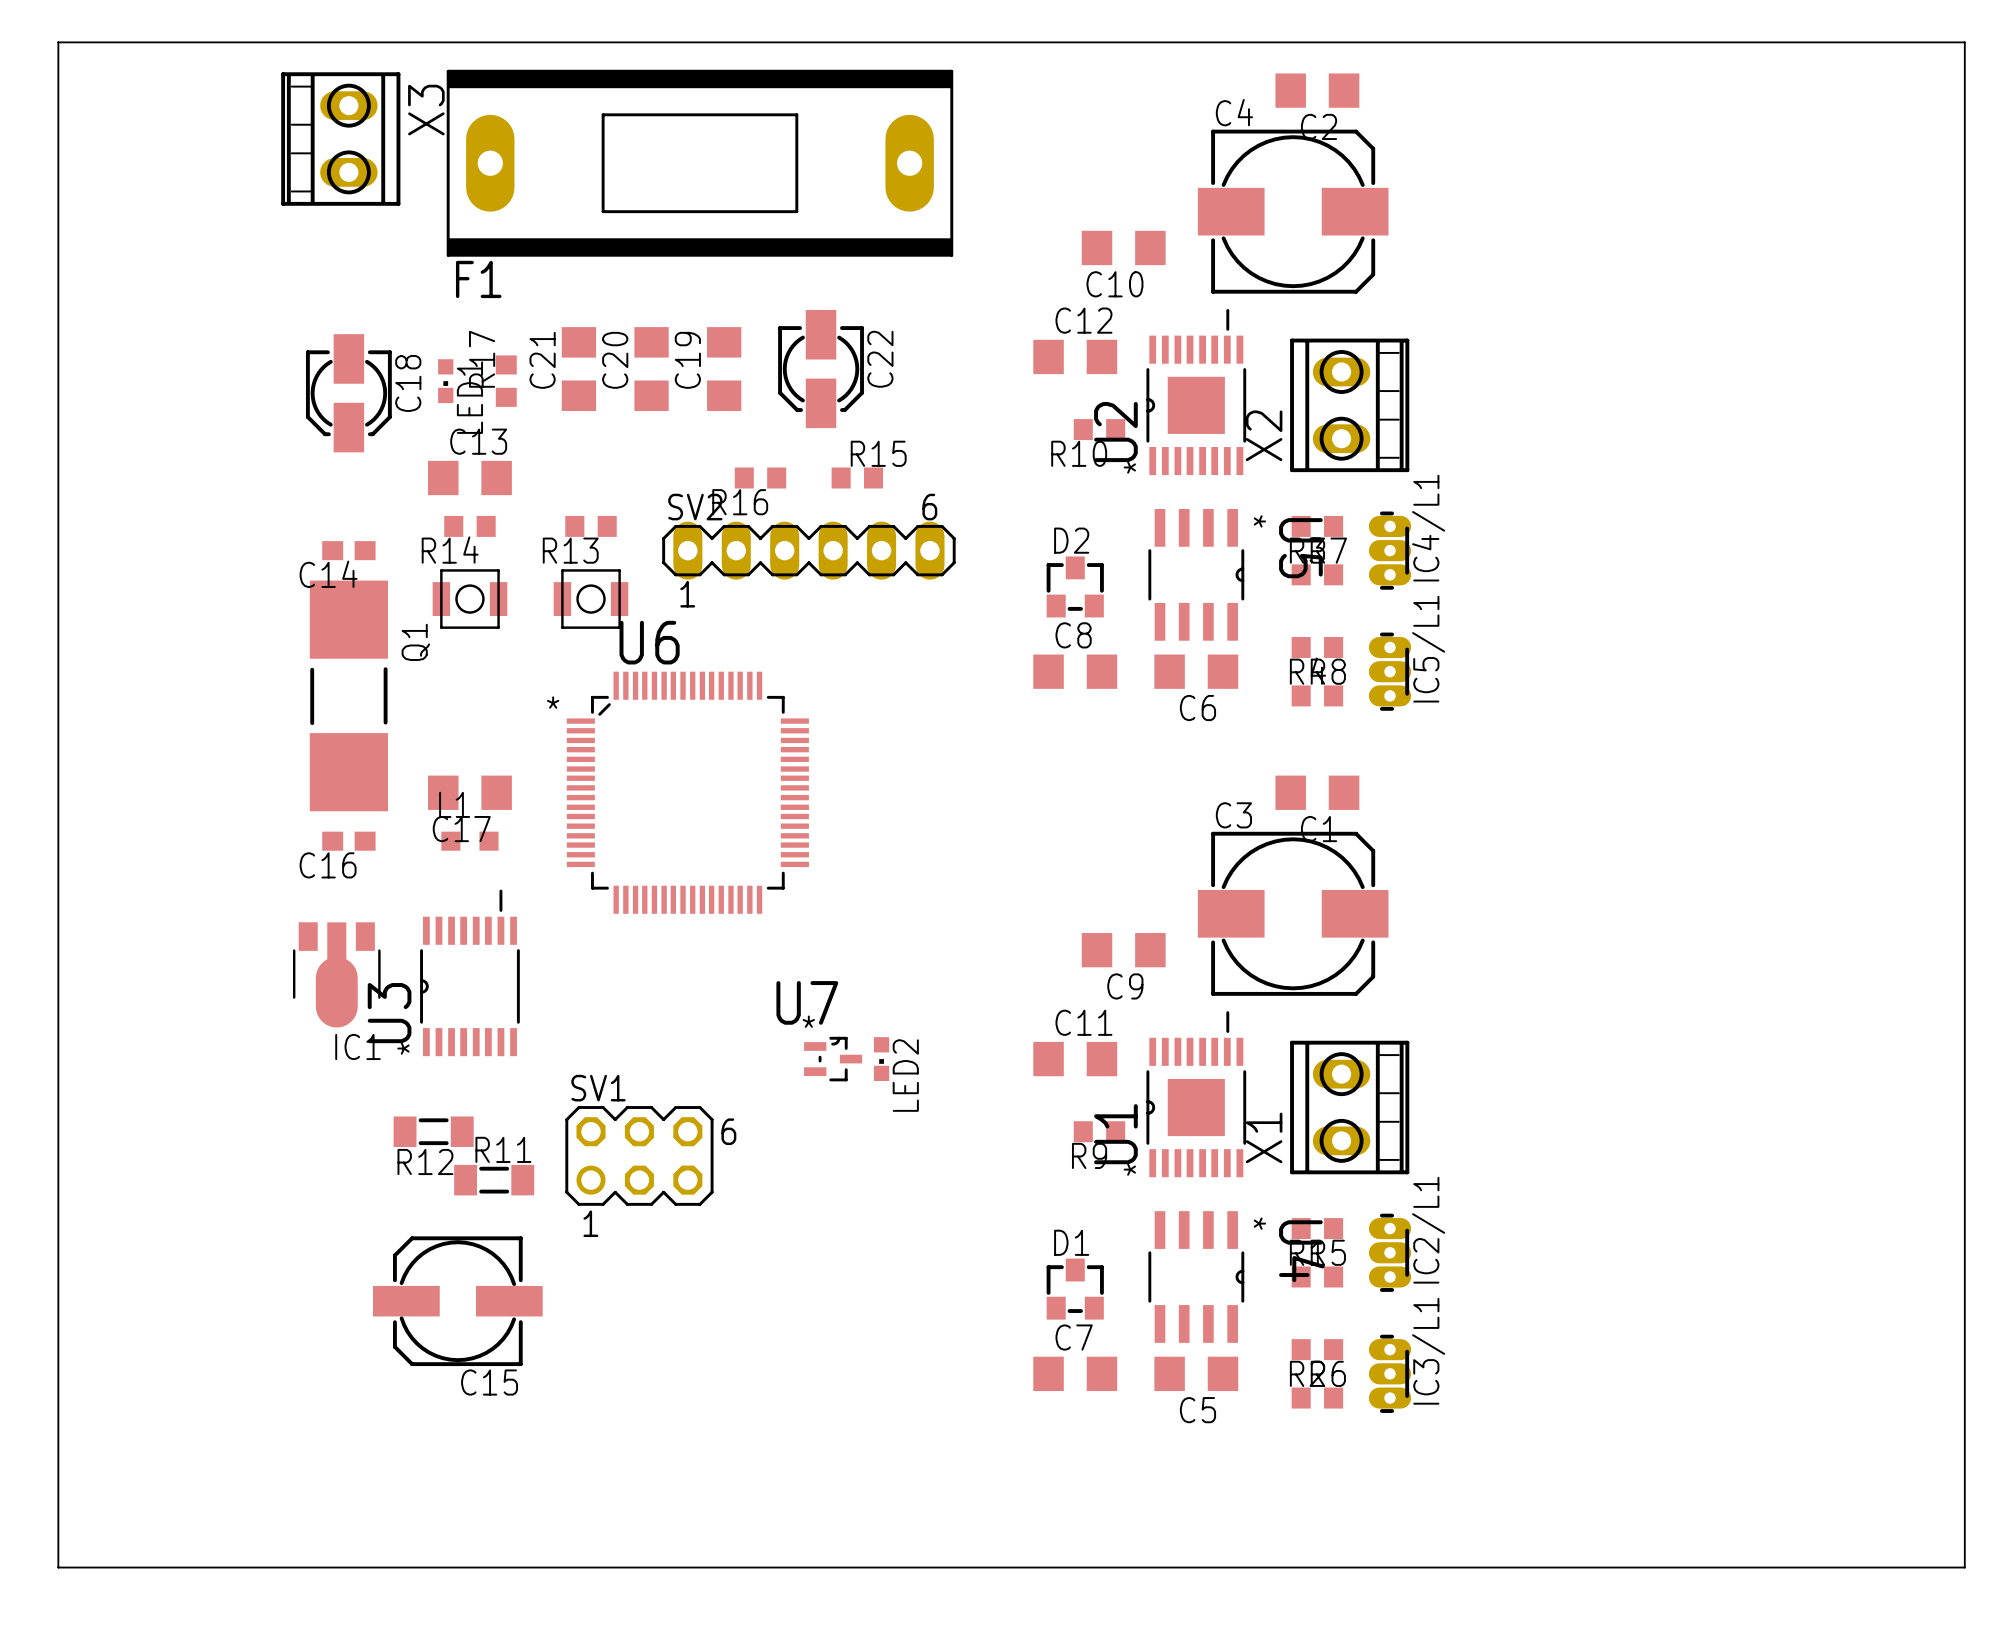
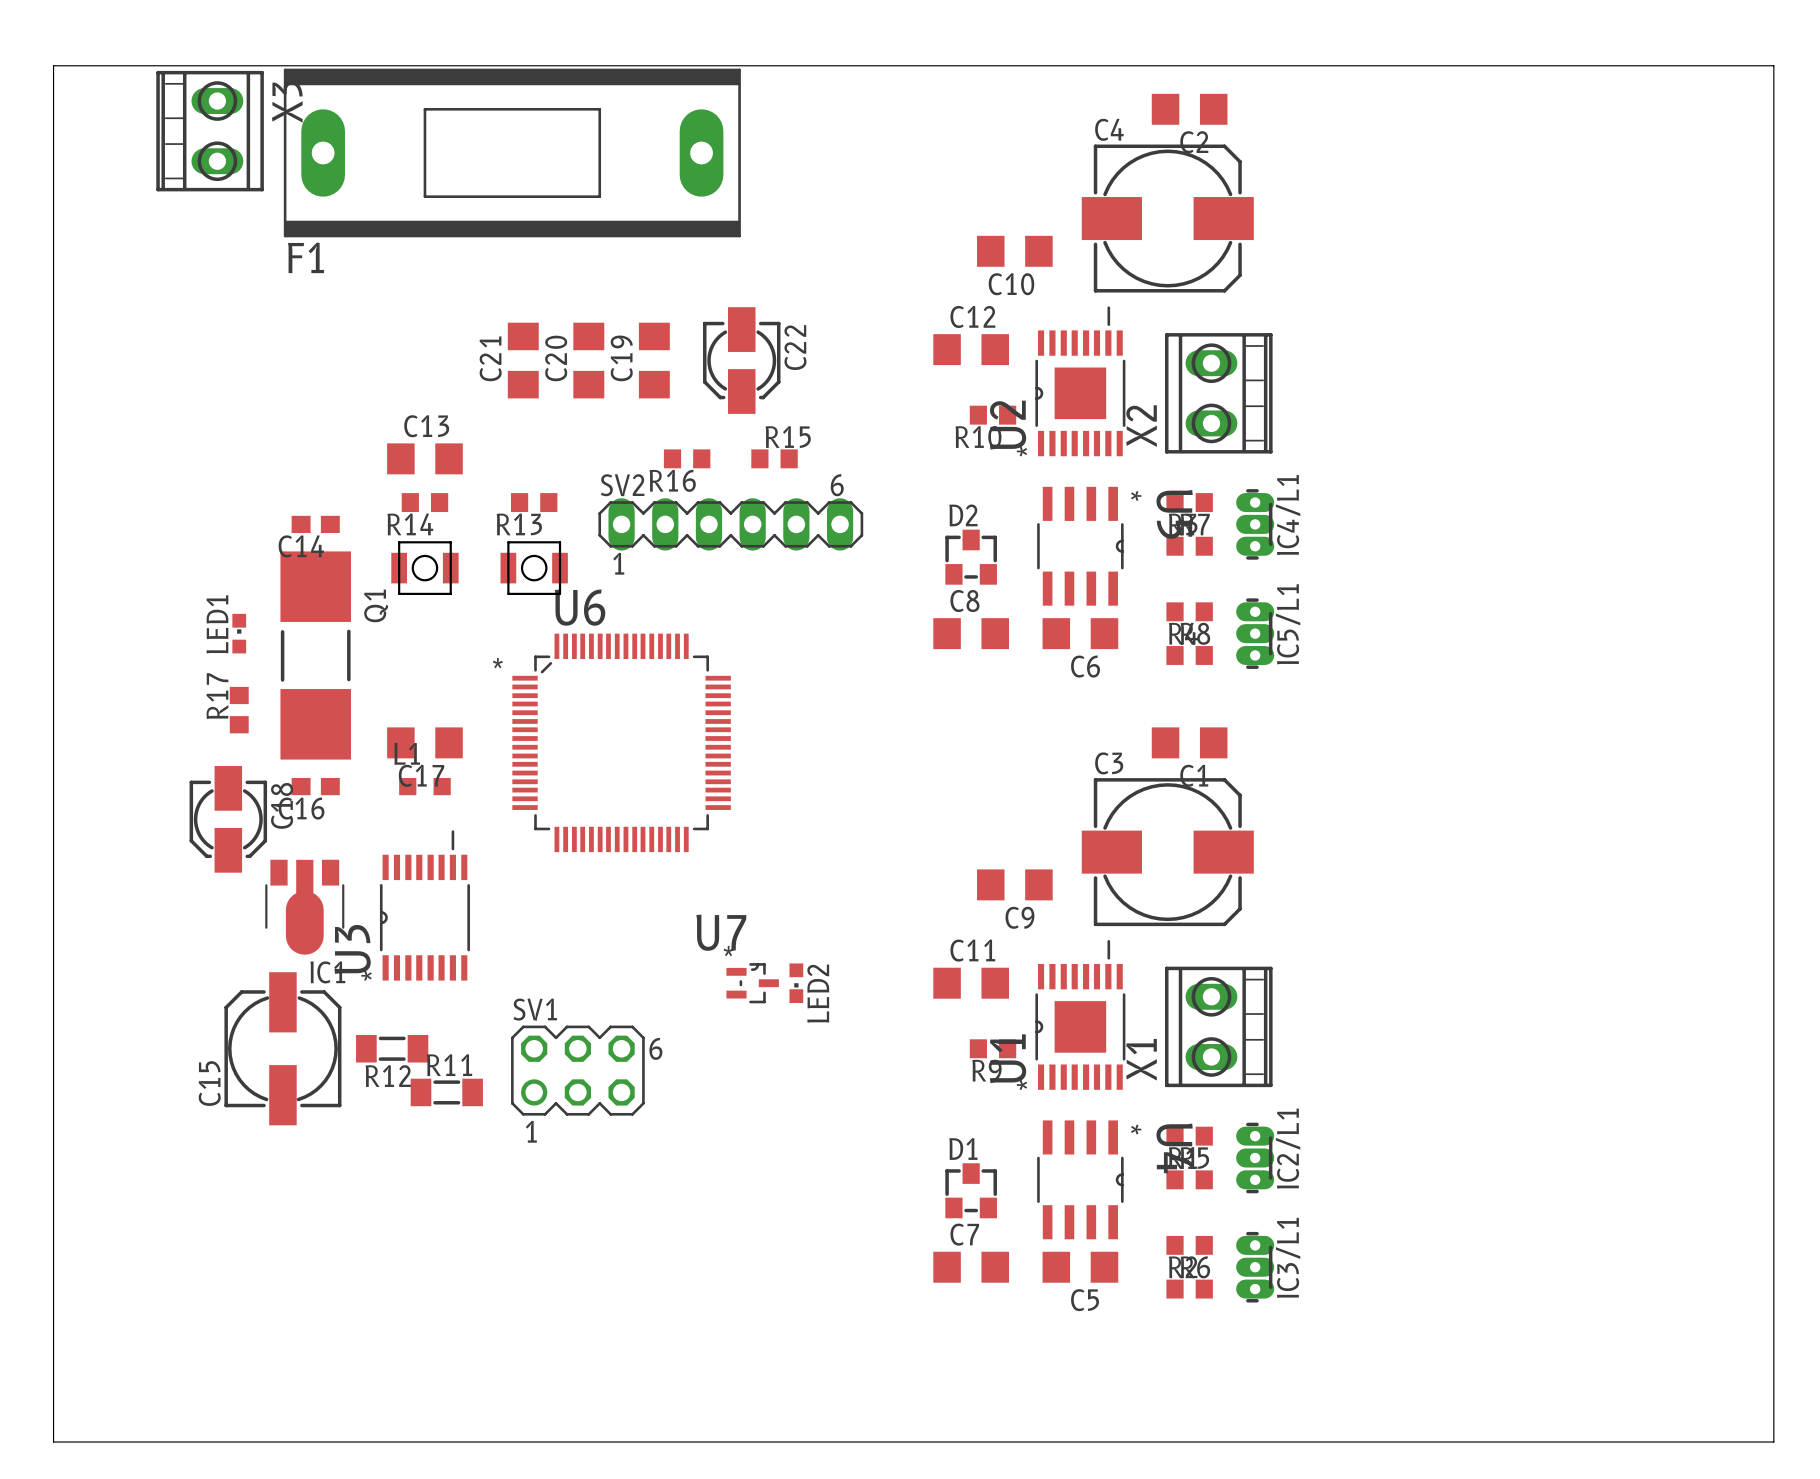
X3 position: (340, 139) -> (210, 131)
F1 position: (699, 163) -> (512, 152)
LED1 rotation: 0° (445, 381) -> 180° (239, 633)
LED1 position: (445, 381) -> (239, 633)
R17 position: (506, 381) -> (239, 710)
C18 position: (348, 393) -> (228, 819)
C15 rotation: 0° (457, 1301) -> 90° clockwise (282, 1048)
C15 position: (457, 1301) -> (282, 1048)

